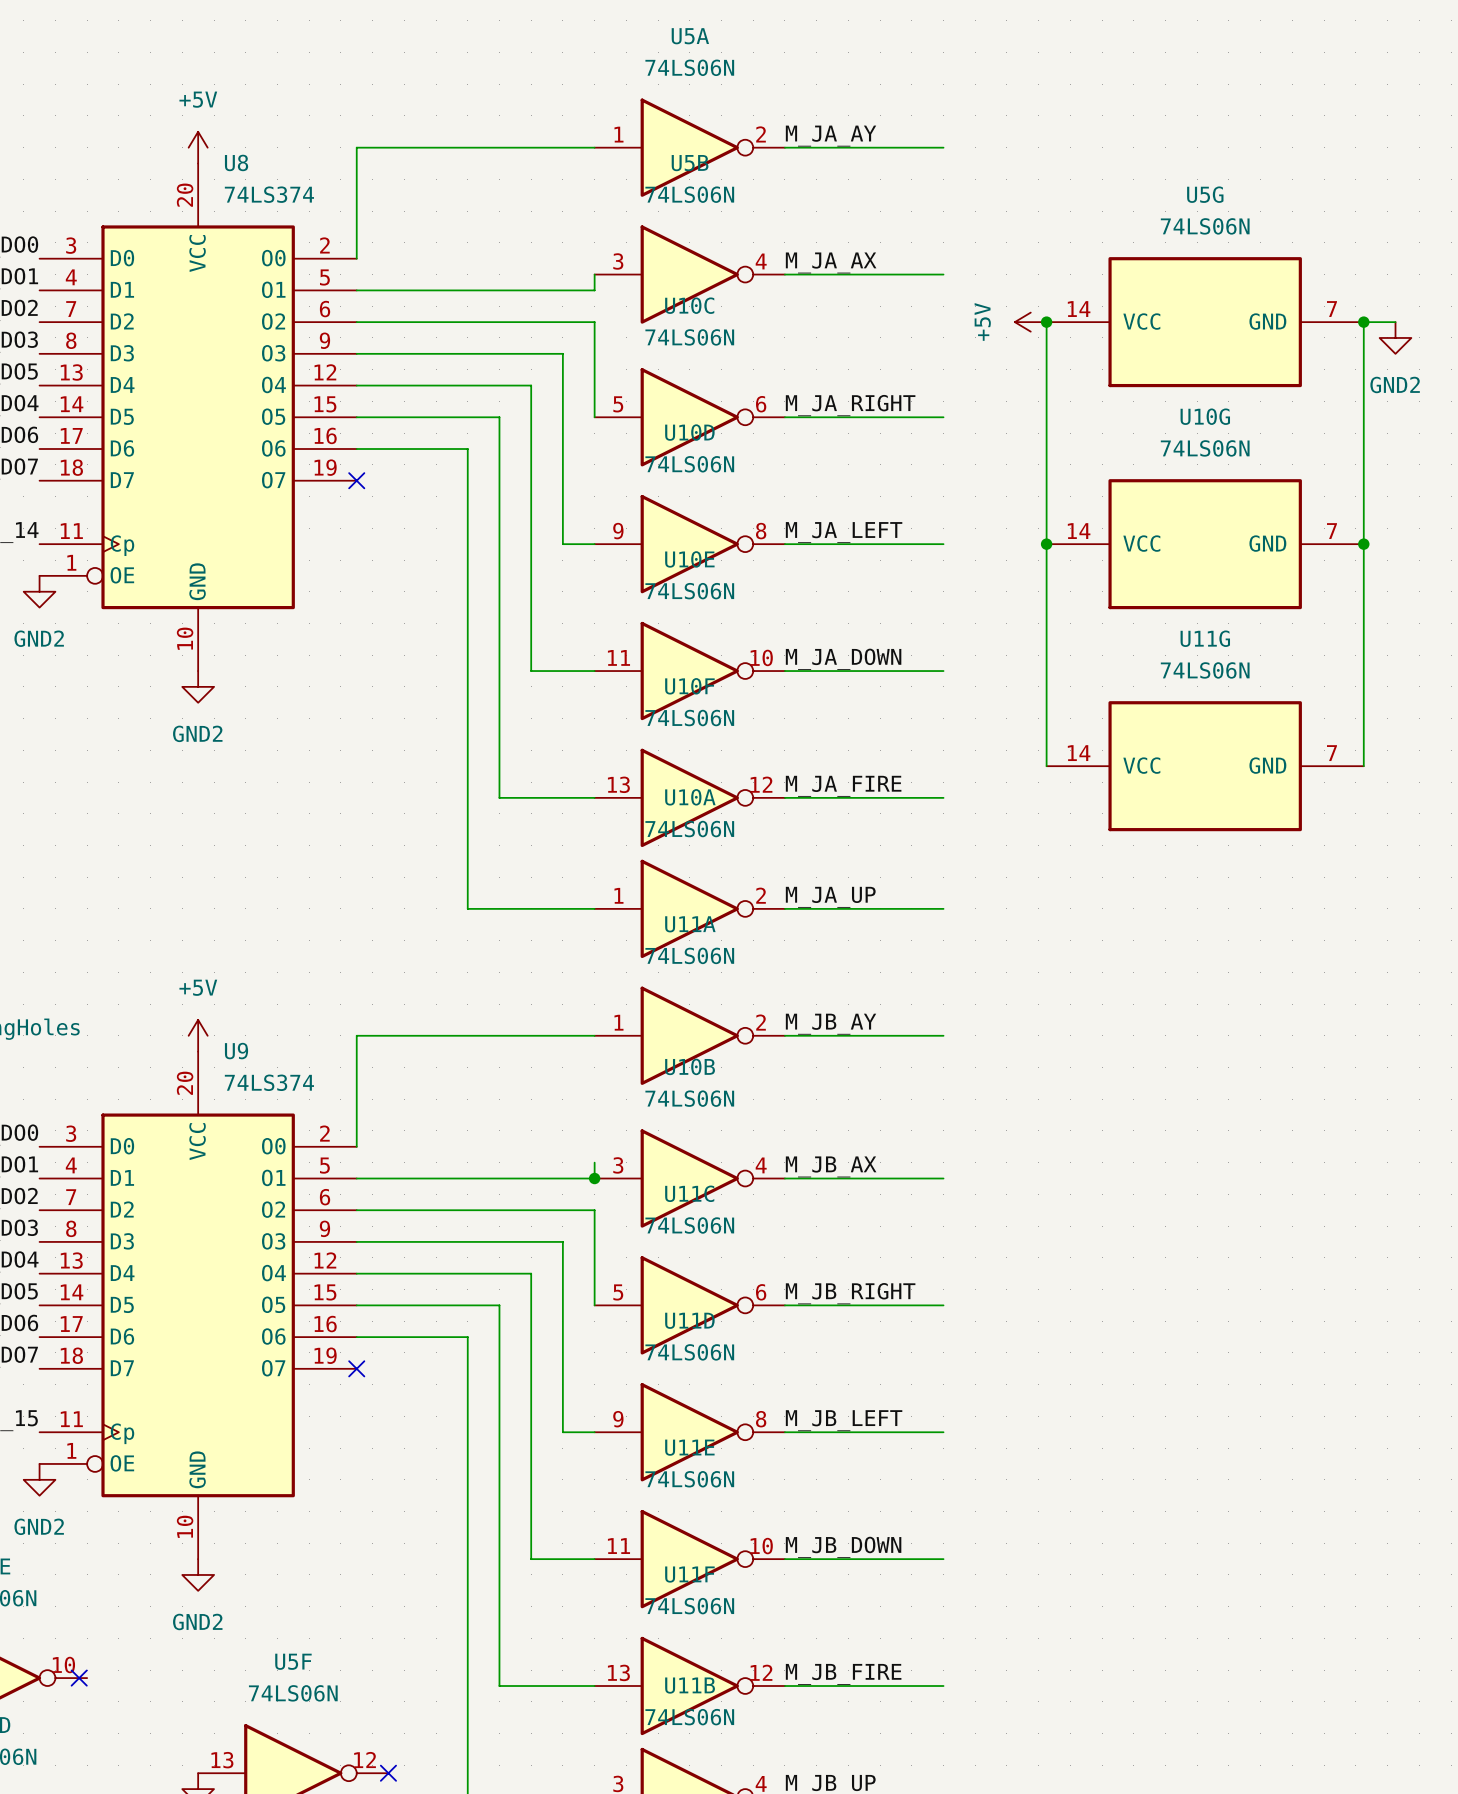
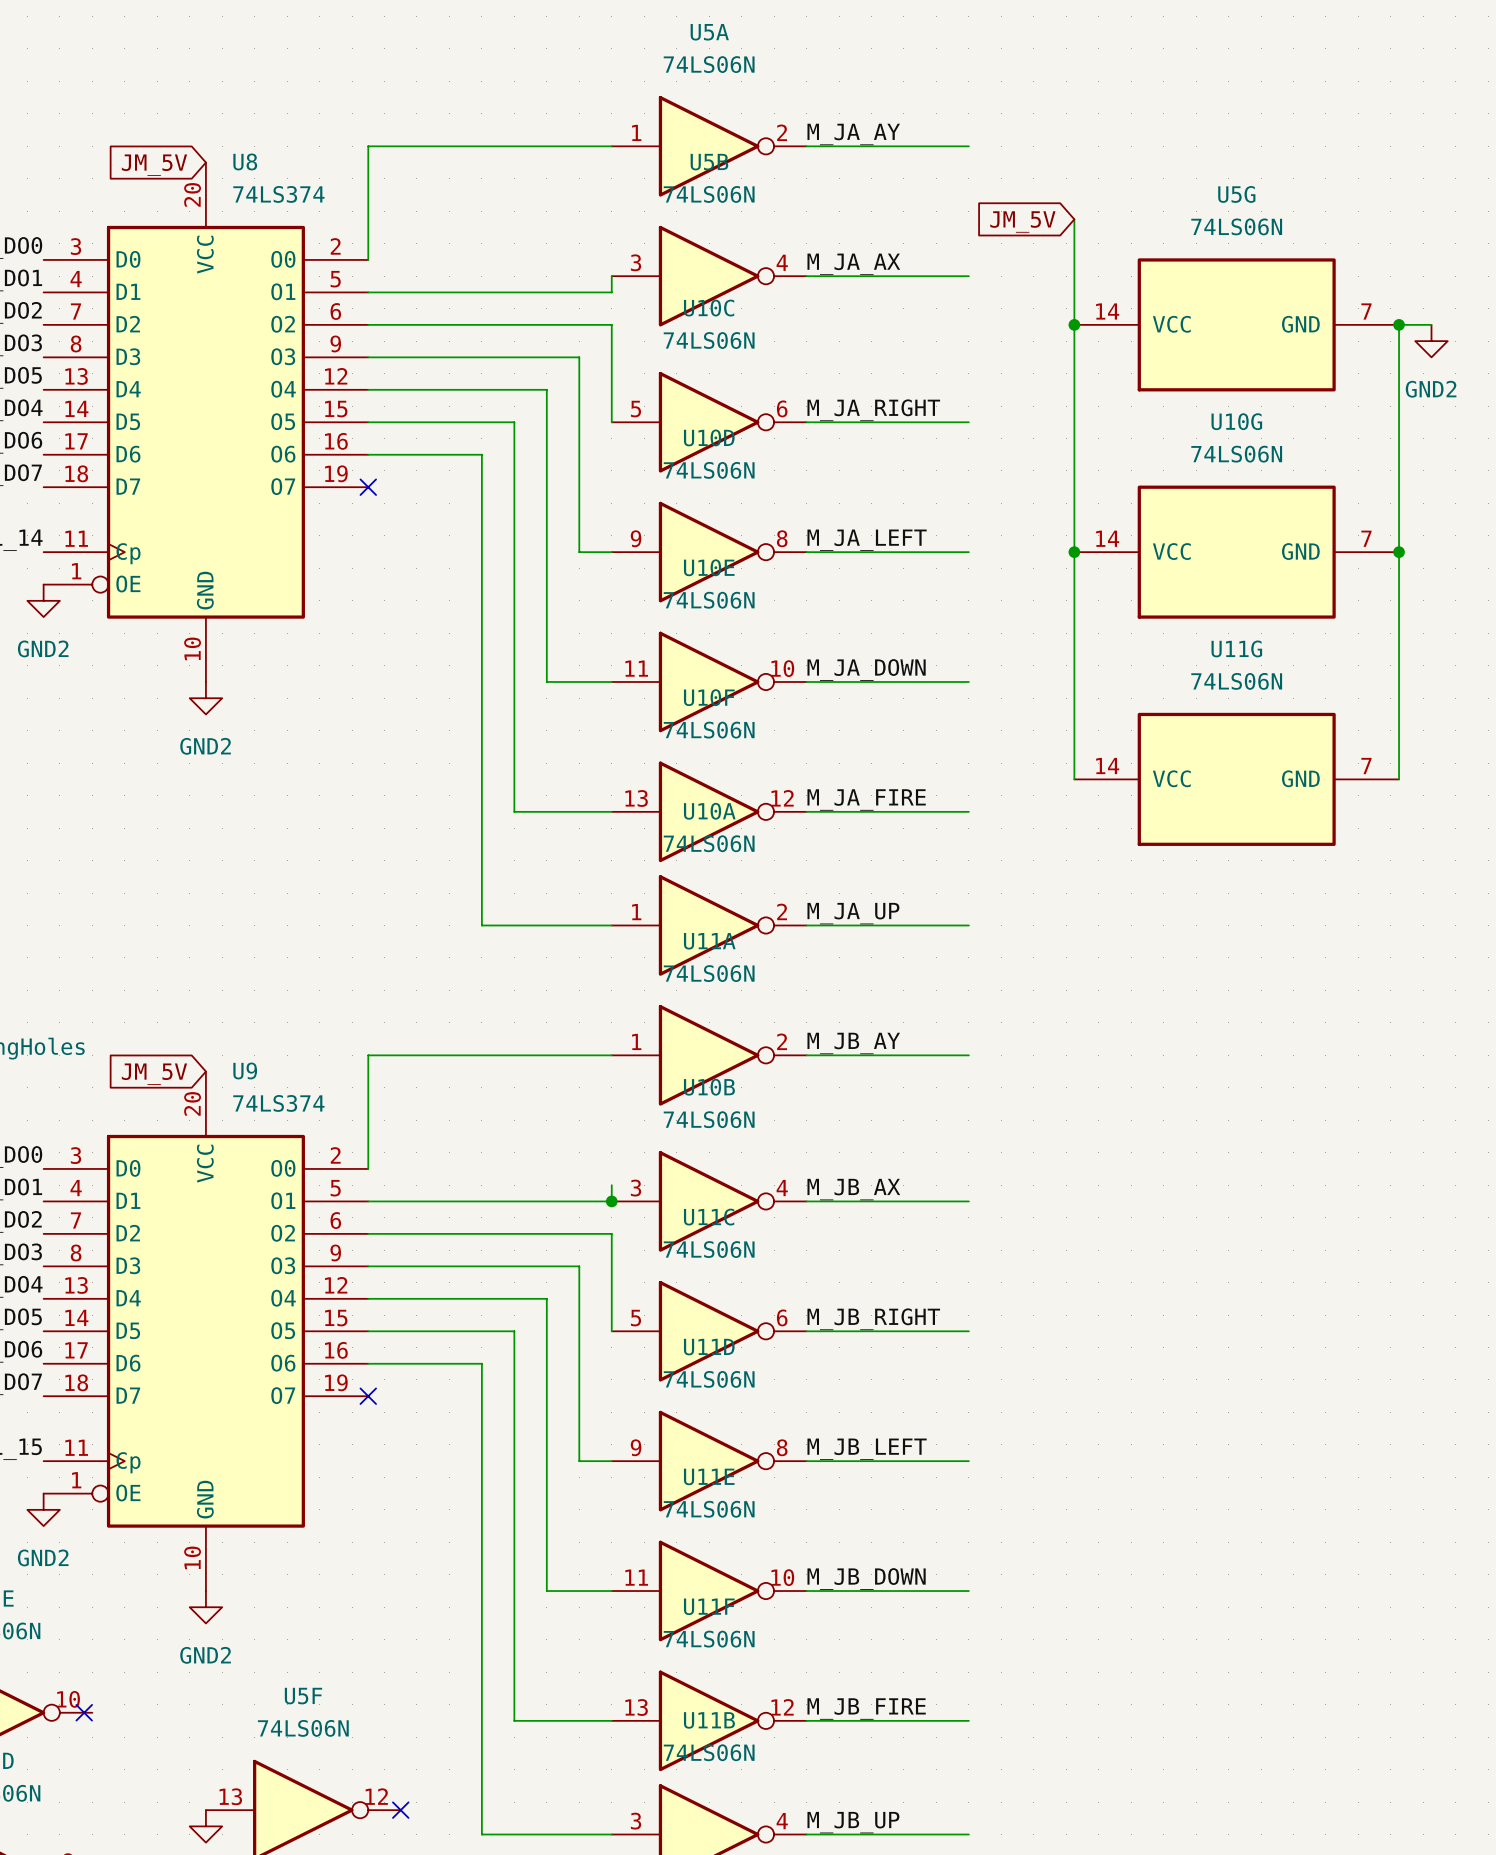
power symbol: +5V (198, 147) -> none
global label: none -> JM_5V (154, 165)
wire: none -> (1074, 219) (1074, 324)
global label: none -> JM_5V (1022, 222)
power symbol: +5V (1030, 322) -> none
power symbol: +5V (198, 1035) -> none
global label: none -> JM_5V (154, 1074)

